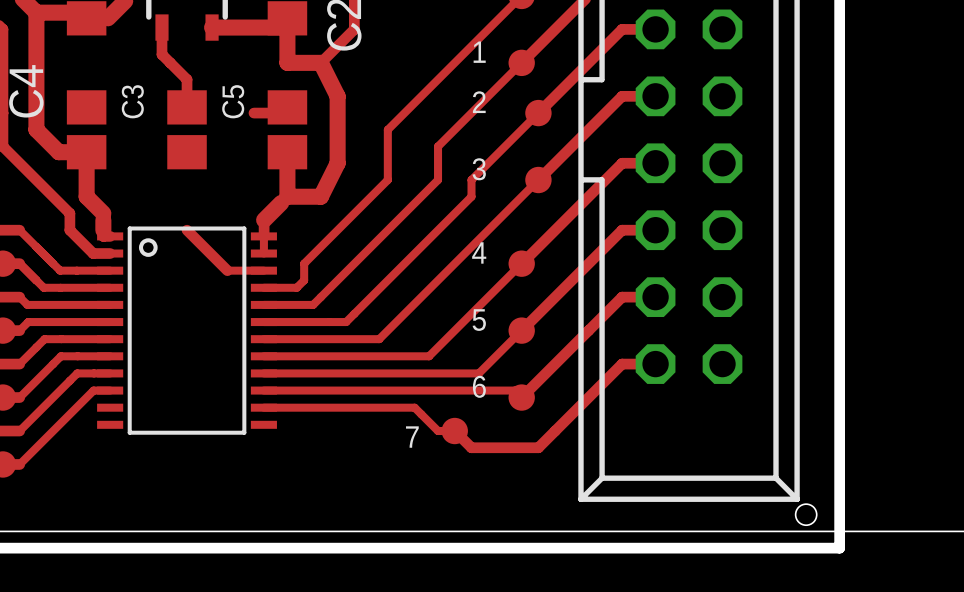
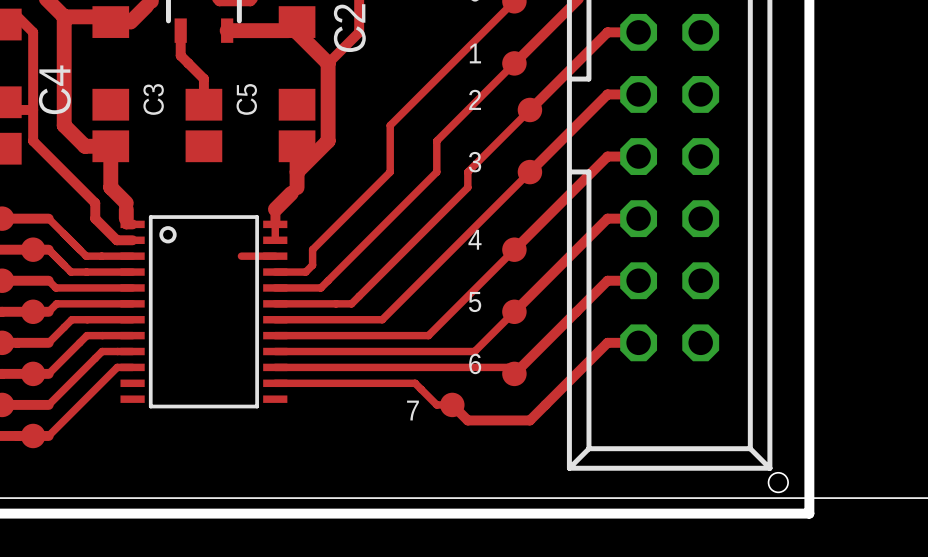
track: (287, 29) (287, 62) (320, 62) (337, 96) (337, 163) (320, 196) (287, 196) -> (297, 32) (328, 63) (328, 141) (297, 172) (297, 187)
track: (253, 113) (281, 113) -> none
track: (187, 230) (227, 270) -> none

